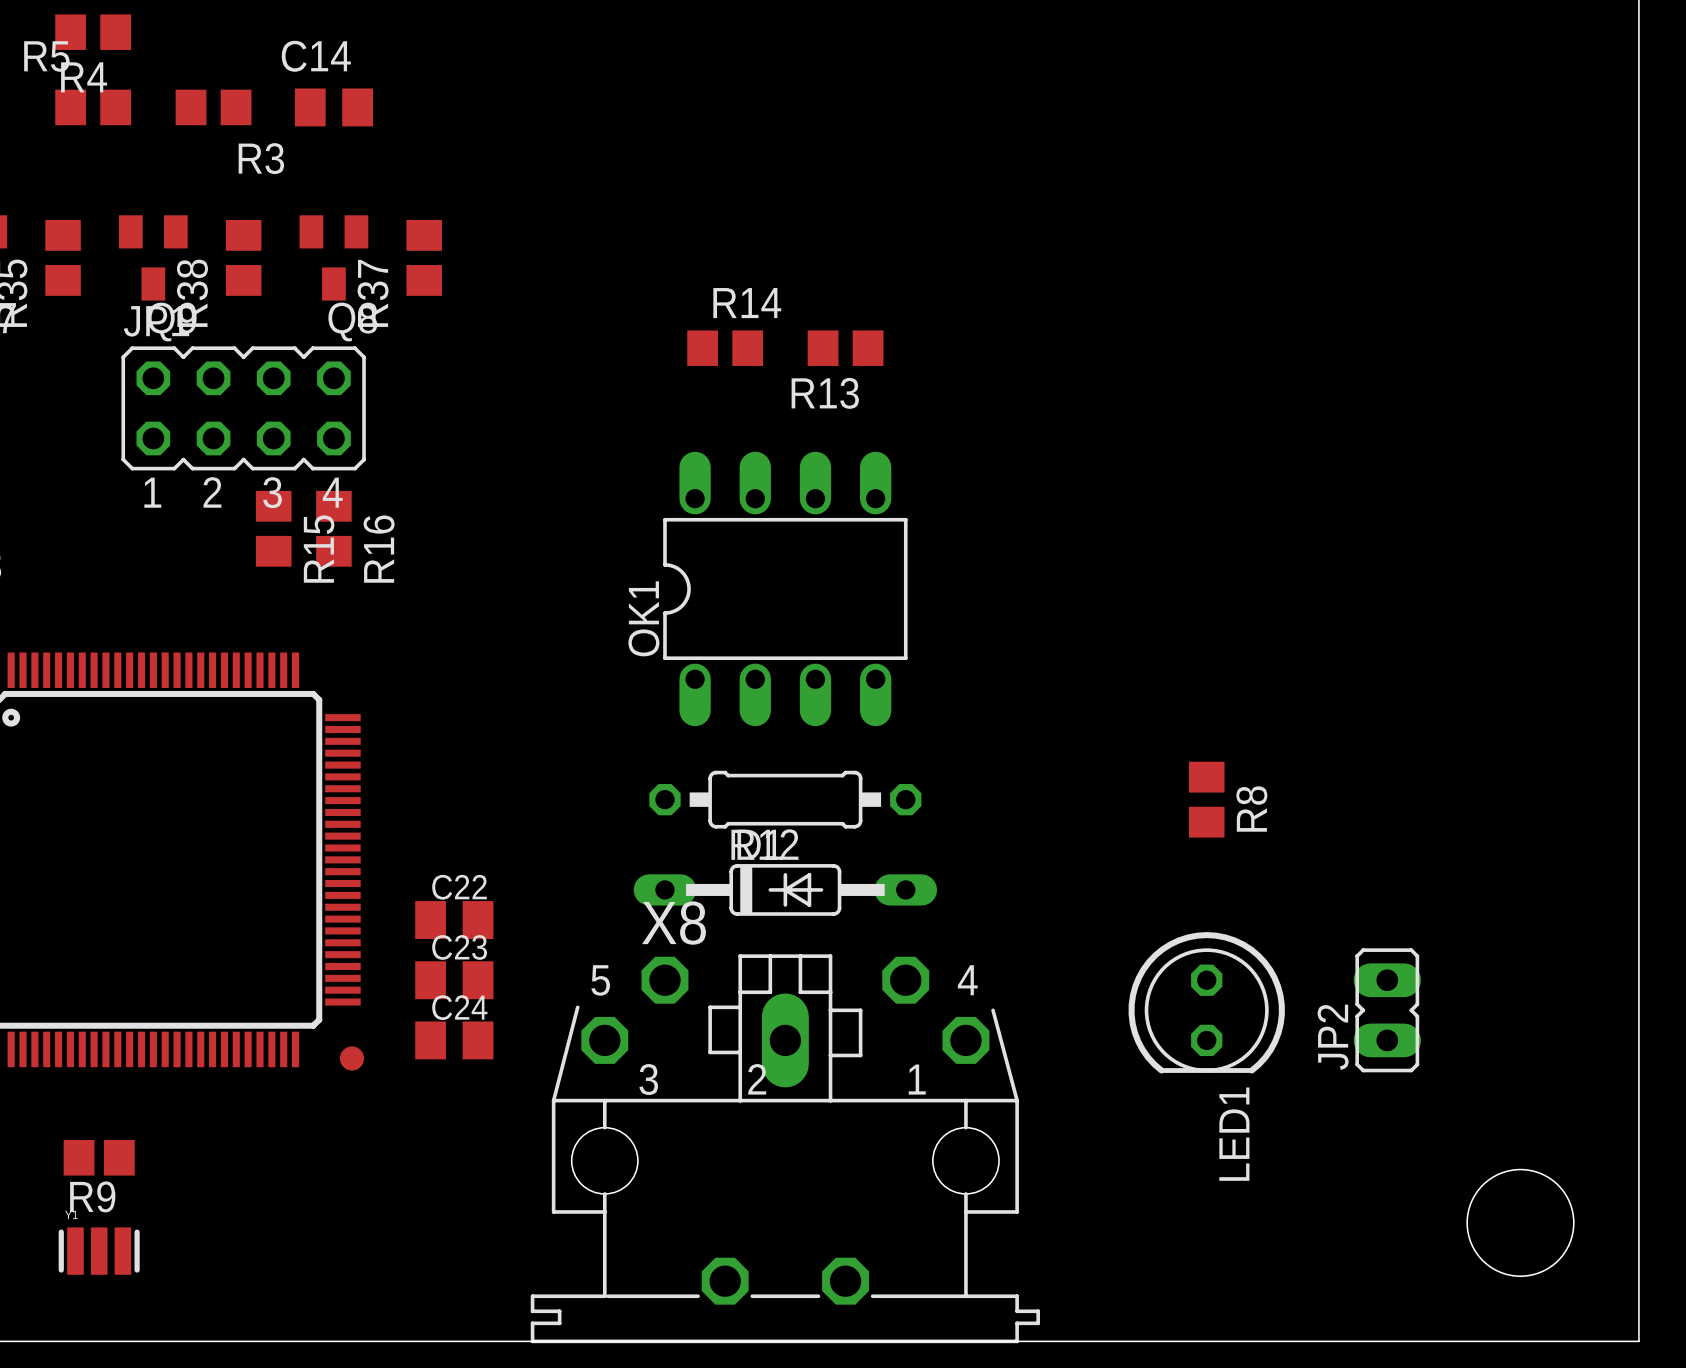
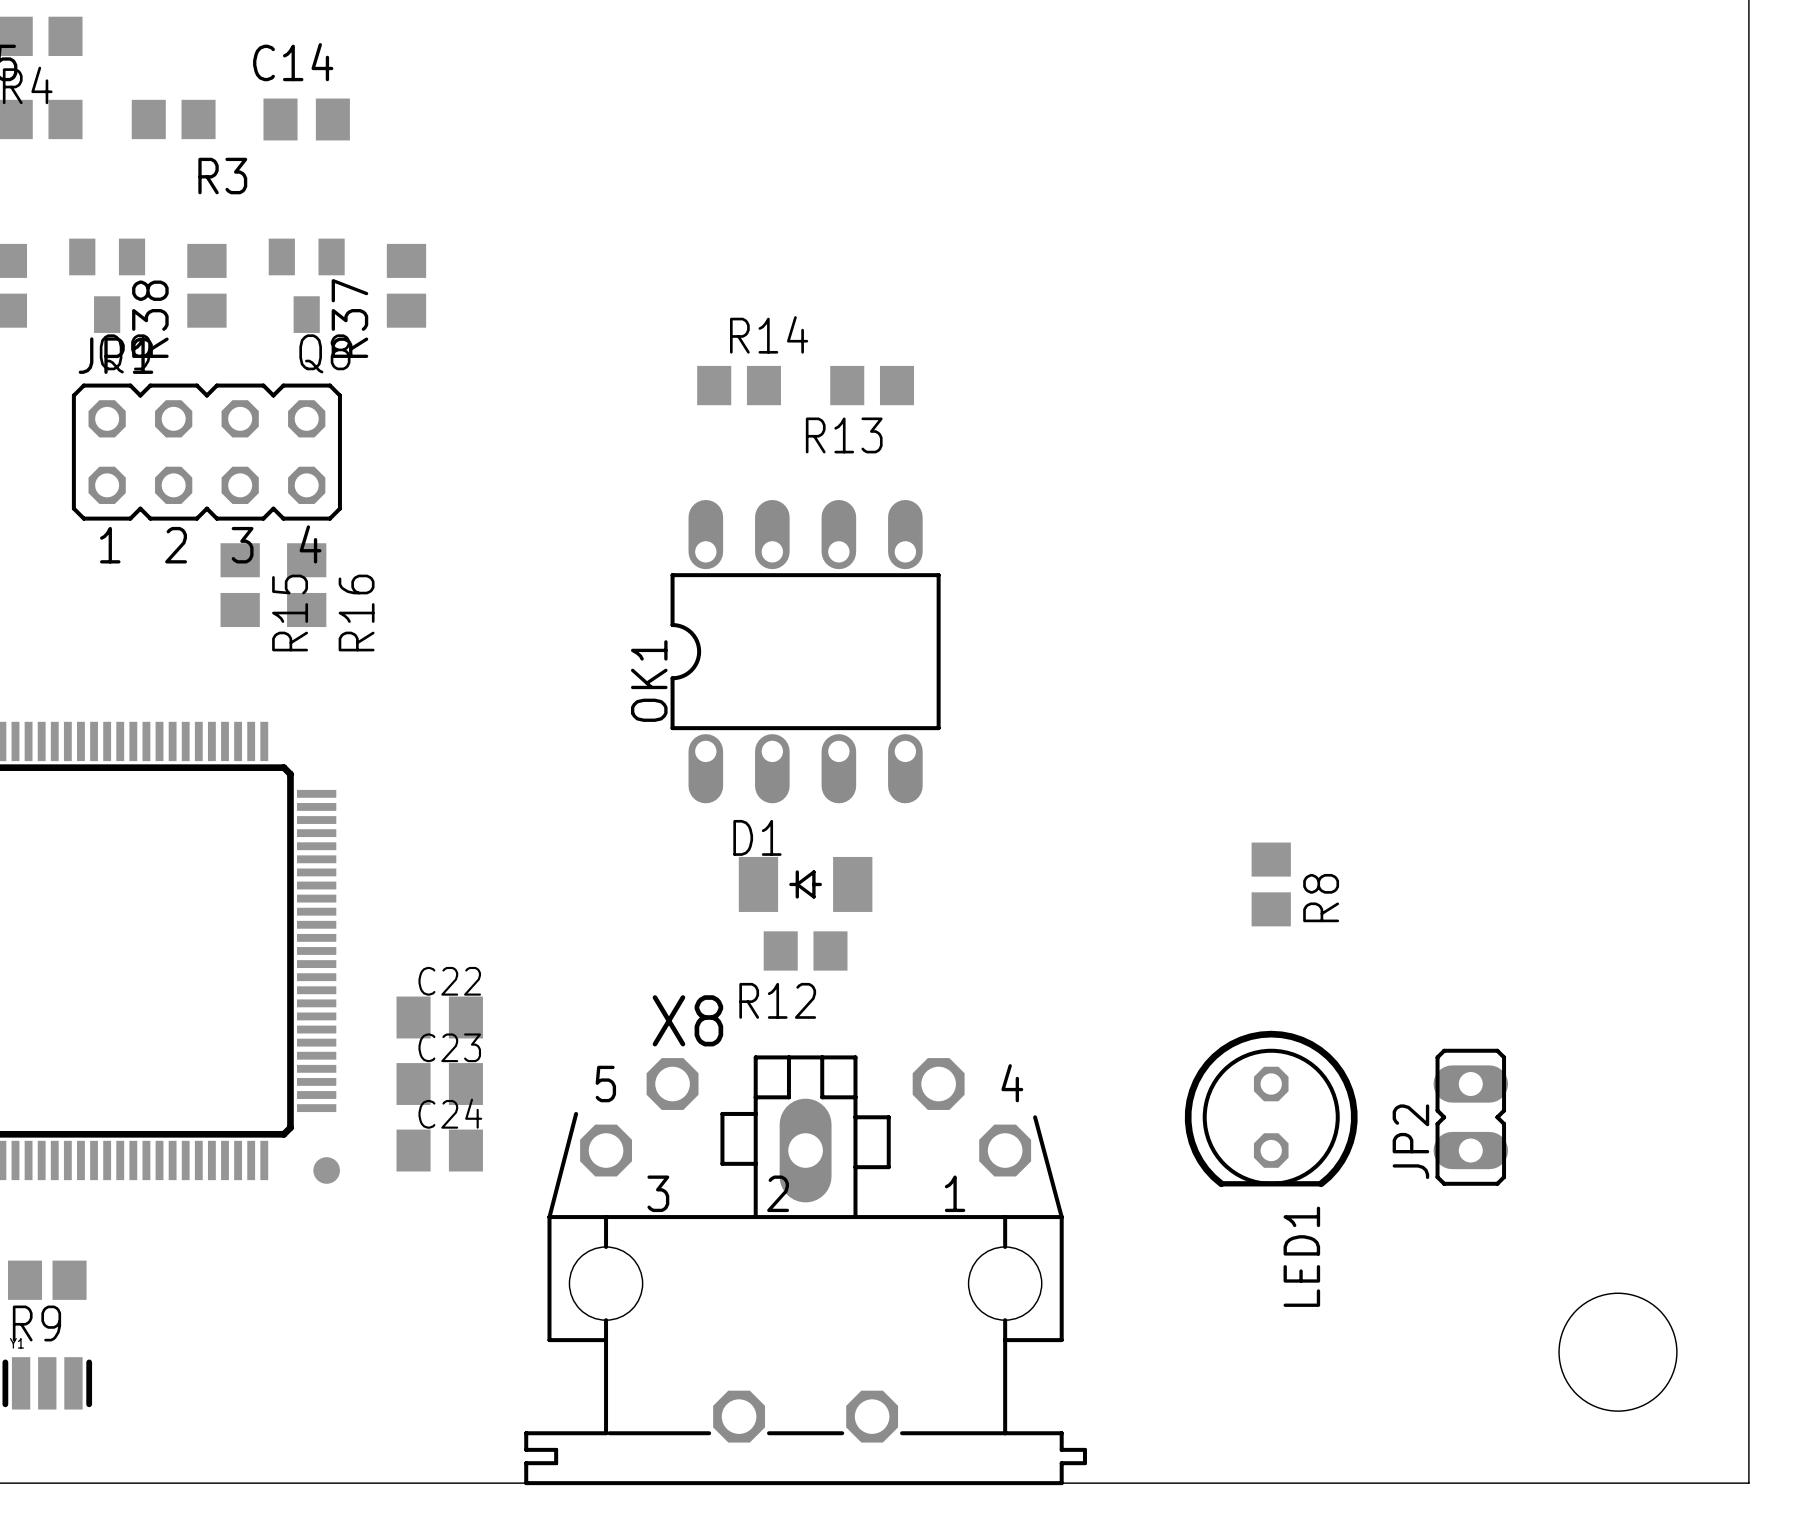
R12 footprint: [649, 770, 922, 829] -> [763, 931, 848, 971]
D1 footprint: [633, 864, 938, 916] -> [738, 856, 873, 912]

